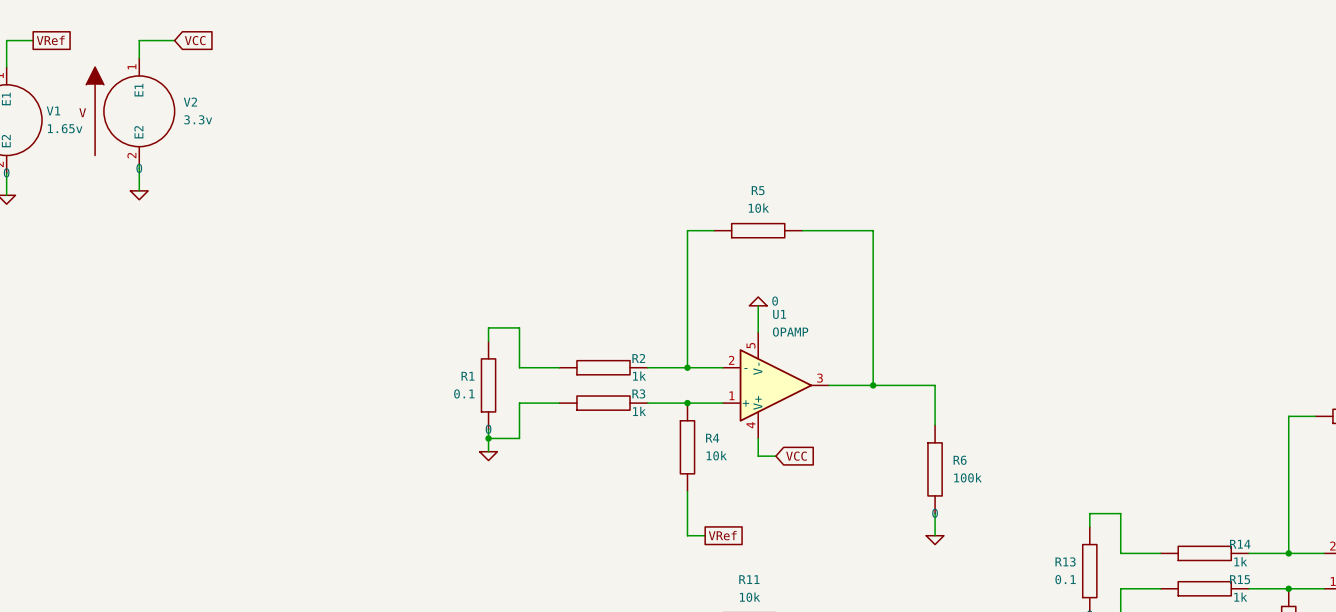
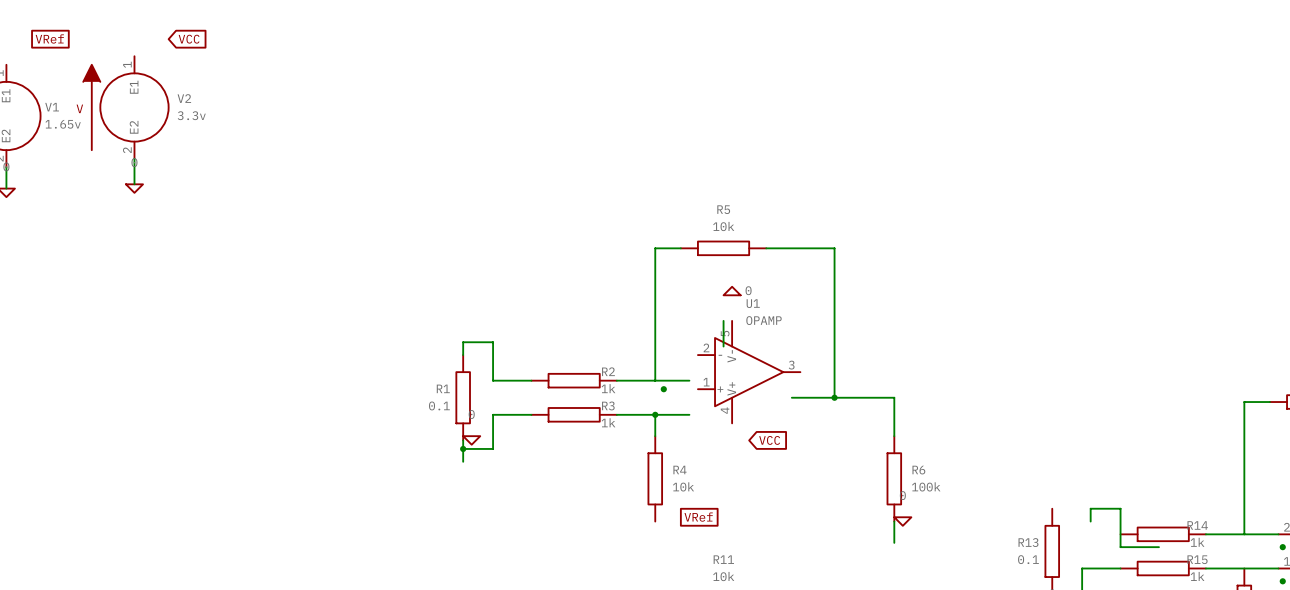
wire: (33, 40) (6, 40) (6, 67) -> none
wire: (174, 40) (139, 40) (139, 58) -> none
wire: (714, 230) (687, 230) (687, 367) -> (680, 248) (655, 248) (655, 380)
R5 position: (758, 230) -> (723, 248)
wire: (802, 230) (873, 230) (873, 385) -> (766, 248) (834, 248) (834, 397)
wire: (758, 305) (758, 332) -> (723, 320) (723, 346)
wire: (488, 341) (488, 327) (519, 327) (519, 367) (559, 367) -> (463, 355) (463, 342) (493, 342) (493, 380) (531, 380)
R2 position: (603, 367) -> (574, 380)
wire: (647, 367) (722, 367) -> (616, 380) (689, 380)
junction: (687, 367) -> none
R1 position: (488, 385) -> (463, 397)
wire: (828, 385) (935, 385) (935, 425) -> (791, 397) (894, 397) (894, 436)
junction position: (873, 385) -> (834, 397)
wire: (559, 403) (519, 403) (519, 438) (488, 438) -> (531, 414) (493, 414) (493, 448) (463, 448)
R3 position: (603, 403) -> (574, 414)
wire: (647, 403) (722, 403) -> (616, 414) (689, 414)
wire: (488, 429) (488, 451) -> (463, 440) (463, 461)
wire: none -> (655, 414) (655, 436)
junction: none -> (655, 414)
junction position: (488, 438) -> (463, 448)
wire: (758, 438) (758, 456) (775, 456) -> none
R4 position: (687, 447) -> (655, 478)
R6 position: (935, 469) -> (894, 478)
wire: (687, 491) (687, 535) (705, 535) -> none
wire: (935, 513) (935, 535) -> (894, 521) (894, 542)
wire: (1089, 526) (1089, 513) (1120, 513) (1120, 553) (1160, 553) -> (1090, 521) (1090, 508) (1120, 508) (1120, 547) (1158, 547)
junction: (1288, 553) -> none
junction: none -> (1282, 547)
junction: (1288, 588) -> none
junction: none -> (1282, 581)

